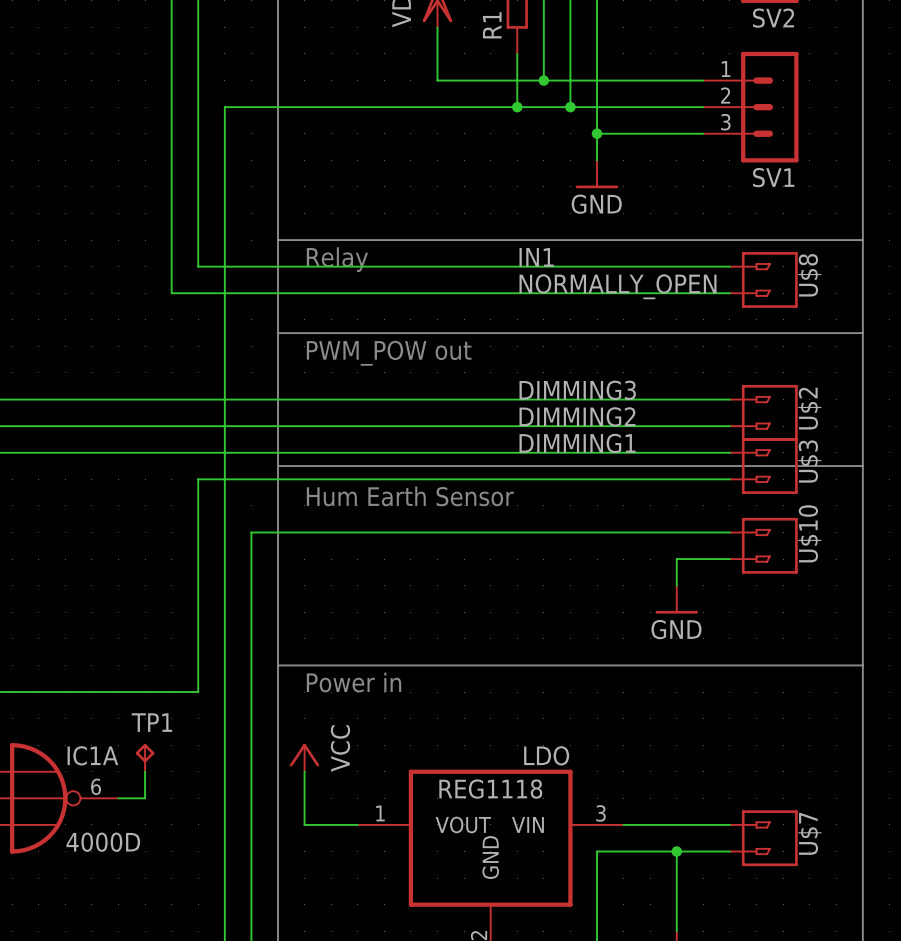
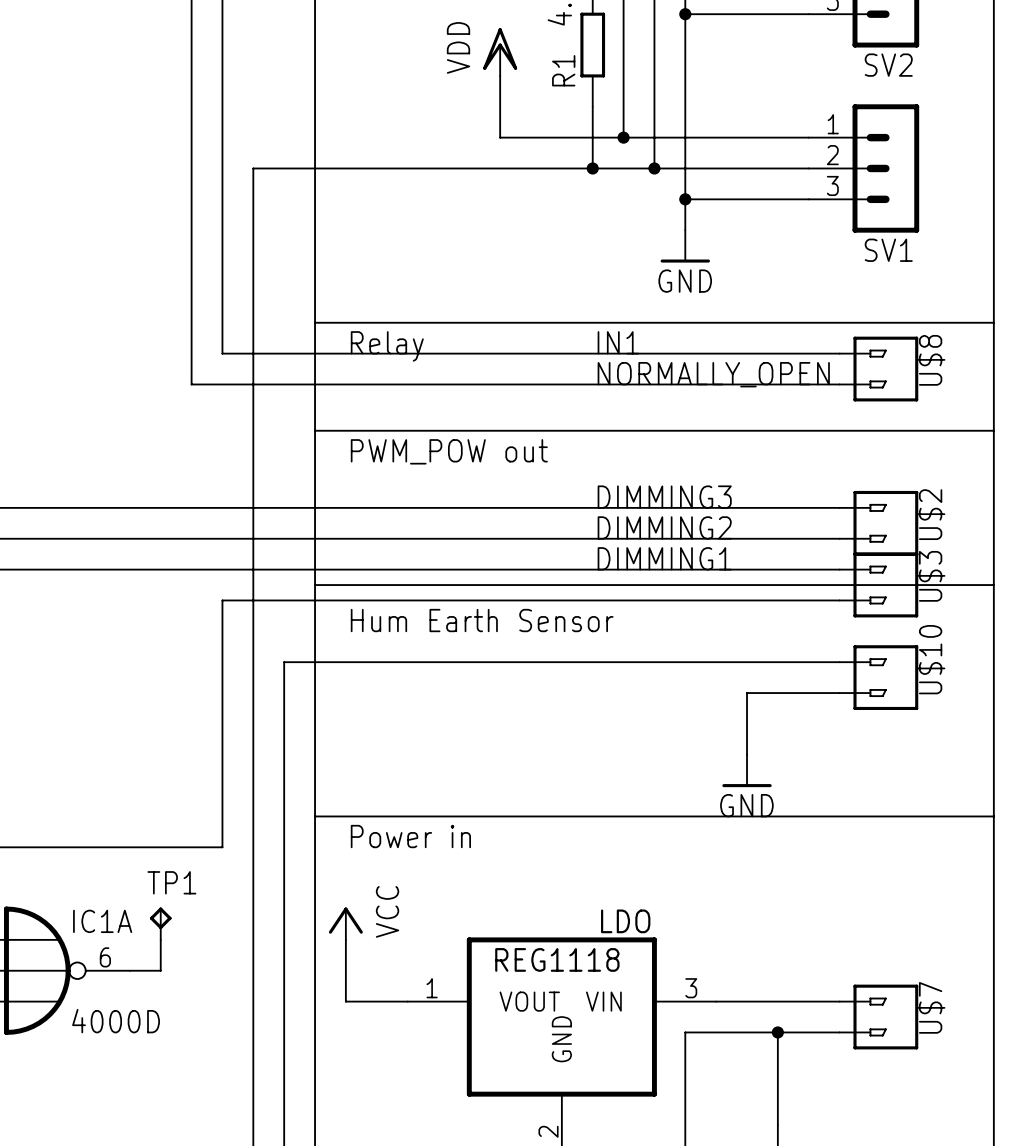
wire: (676, 559) (676, 585) -> (777, 693) (747, 693) (747, 754)
power symbol position: GND (676, 599) -> GND (747, 770)

